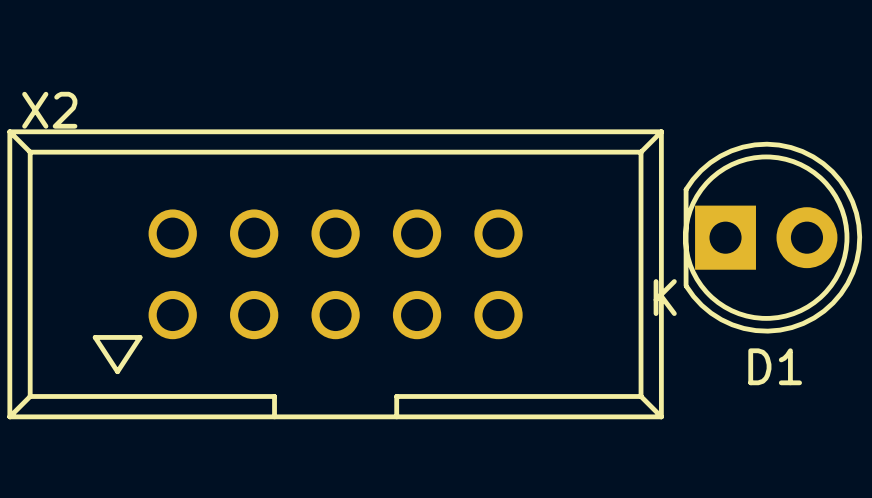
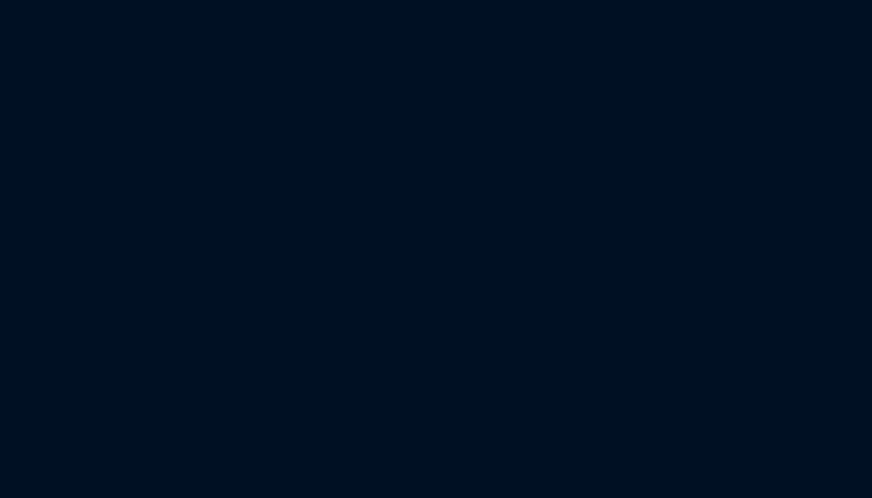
D1: (772, 237) -> none
X2: (335, 274) -> none

